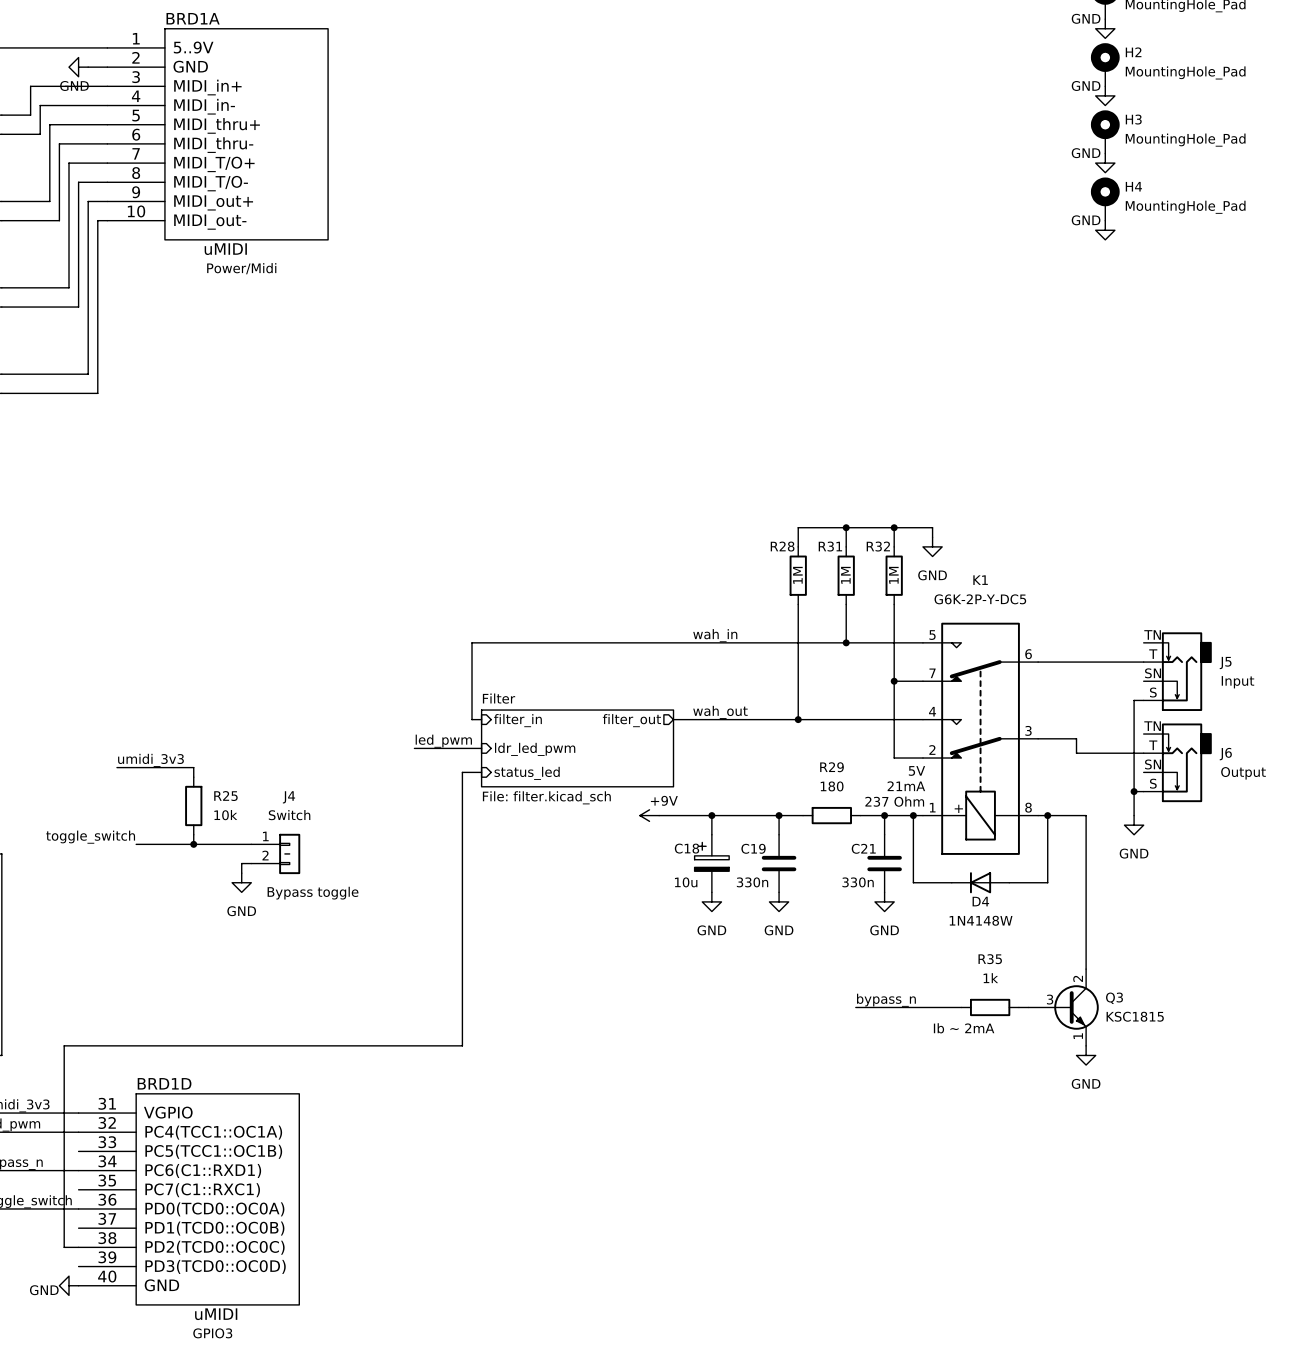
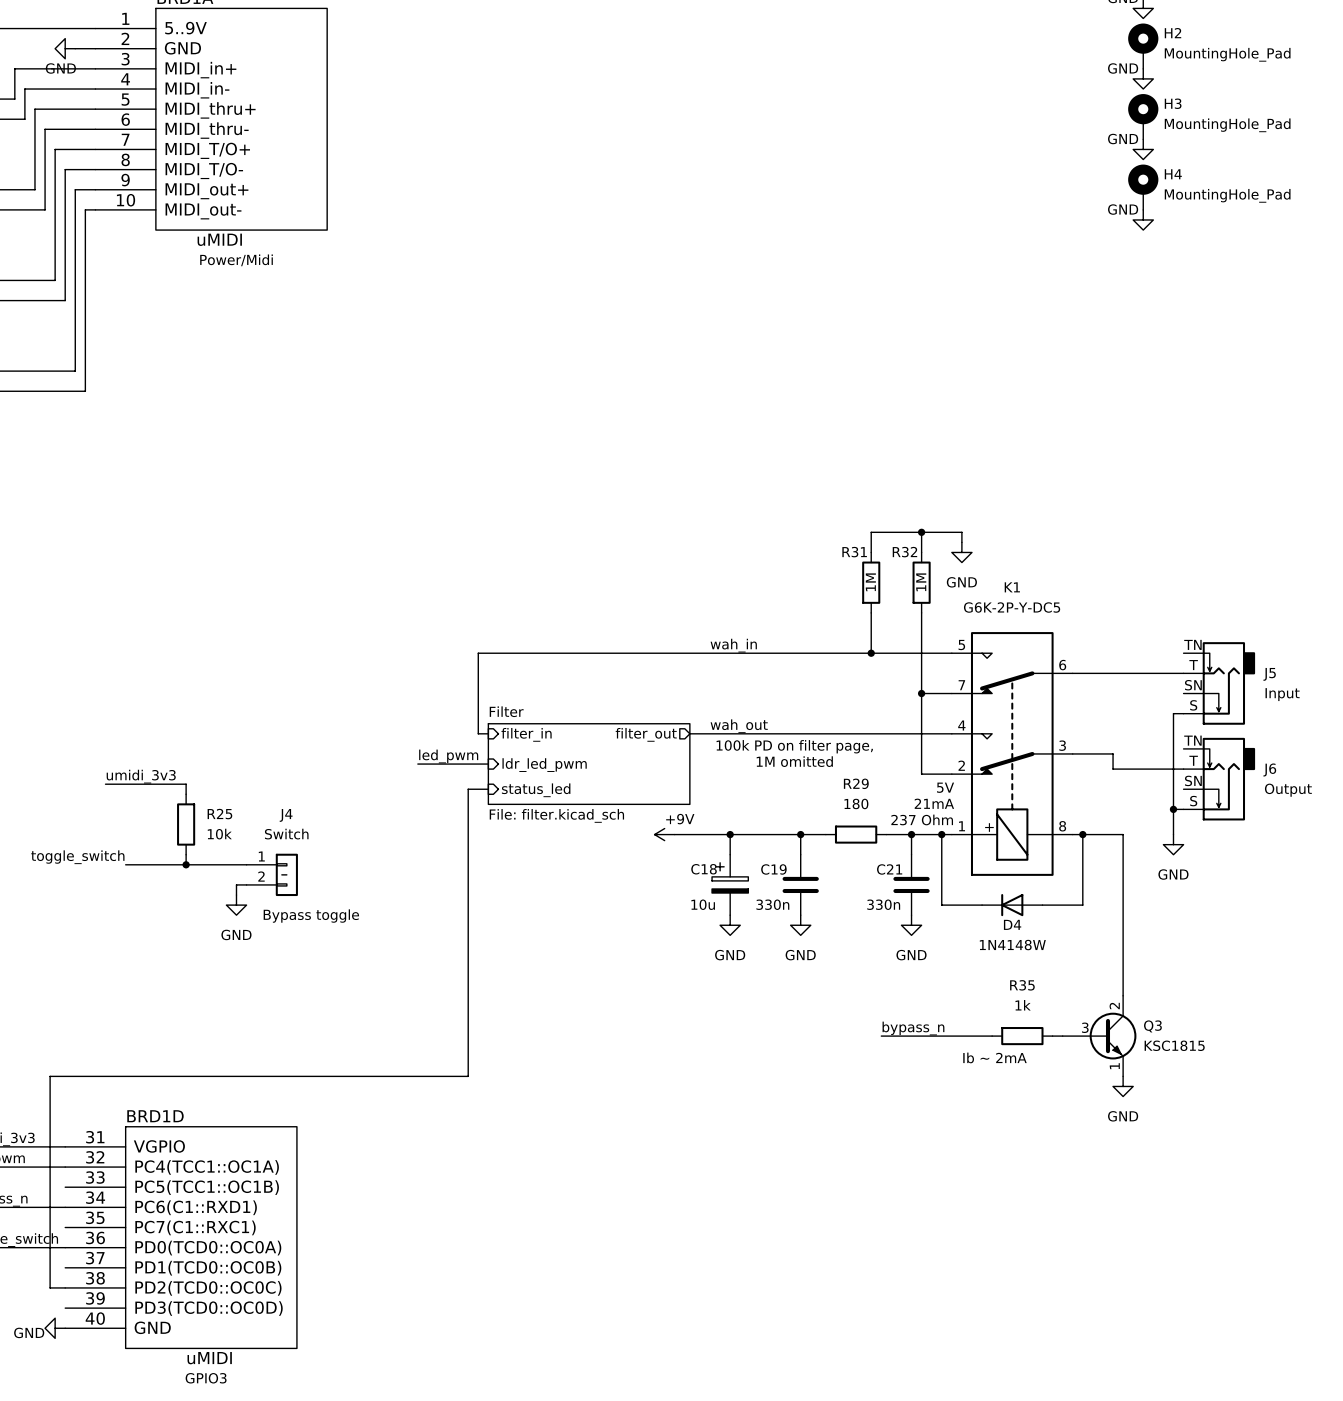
wire: (846, 527) (798, 527) (798, 546) -> none
junction: (846, 527) -> none
R28: 1M (798, 575) -> none
wire: (798, 604) (798, 719) -> none
junction: (798, 719) -> none
text: none -> 100k PD on filter page, (794, 746)
text: none -> 1M omitted (794, 761)

